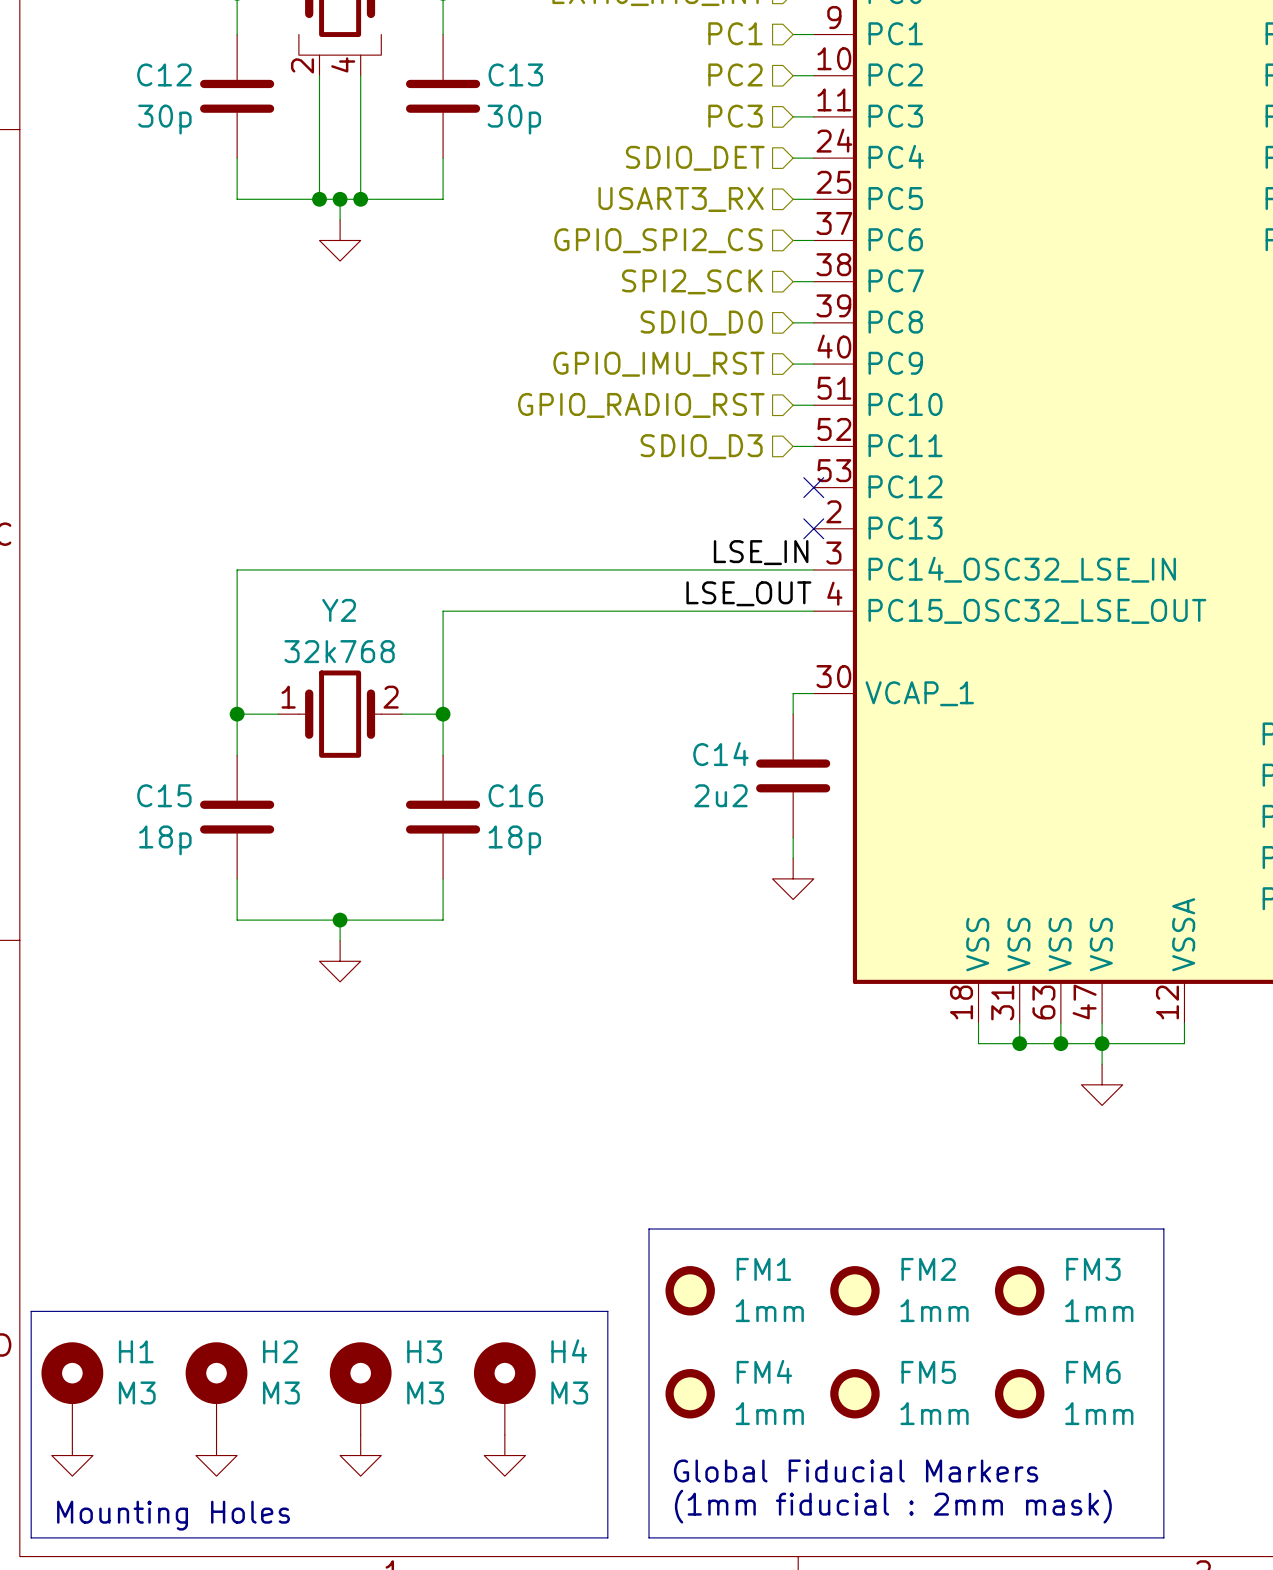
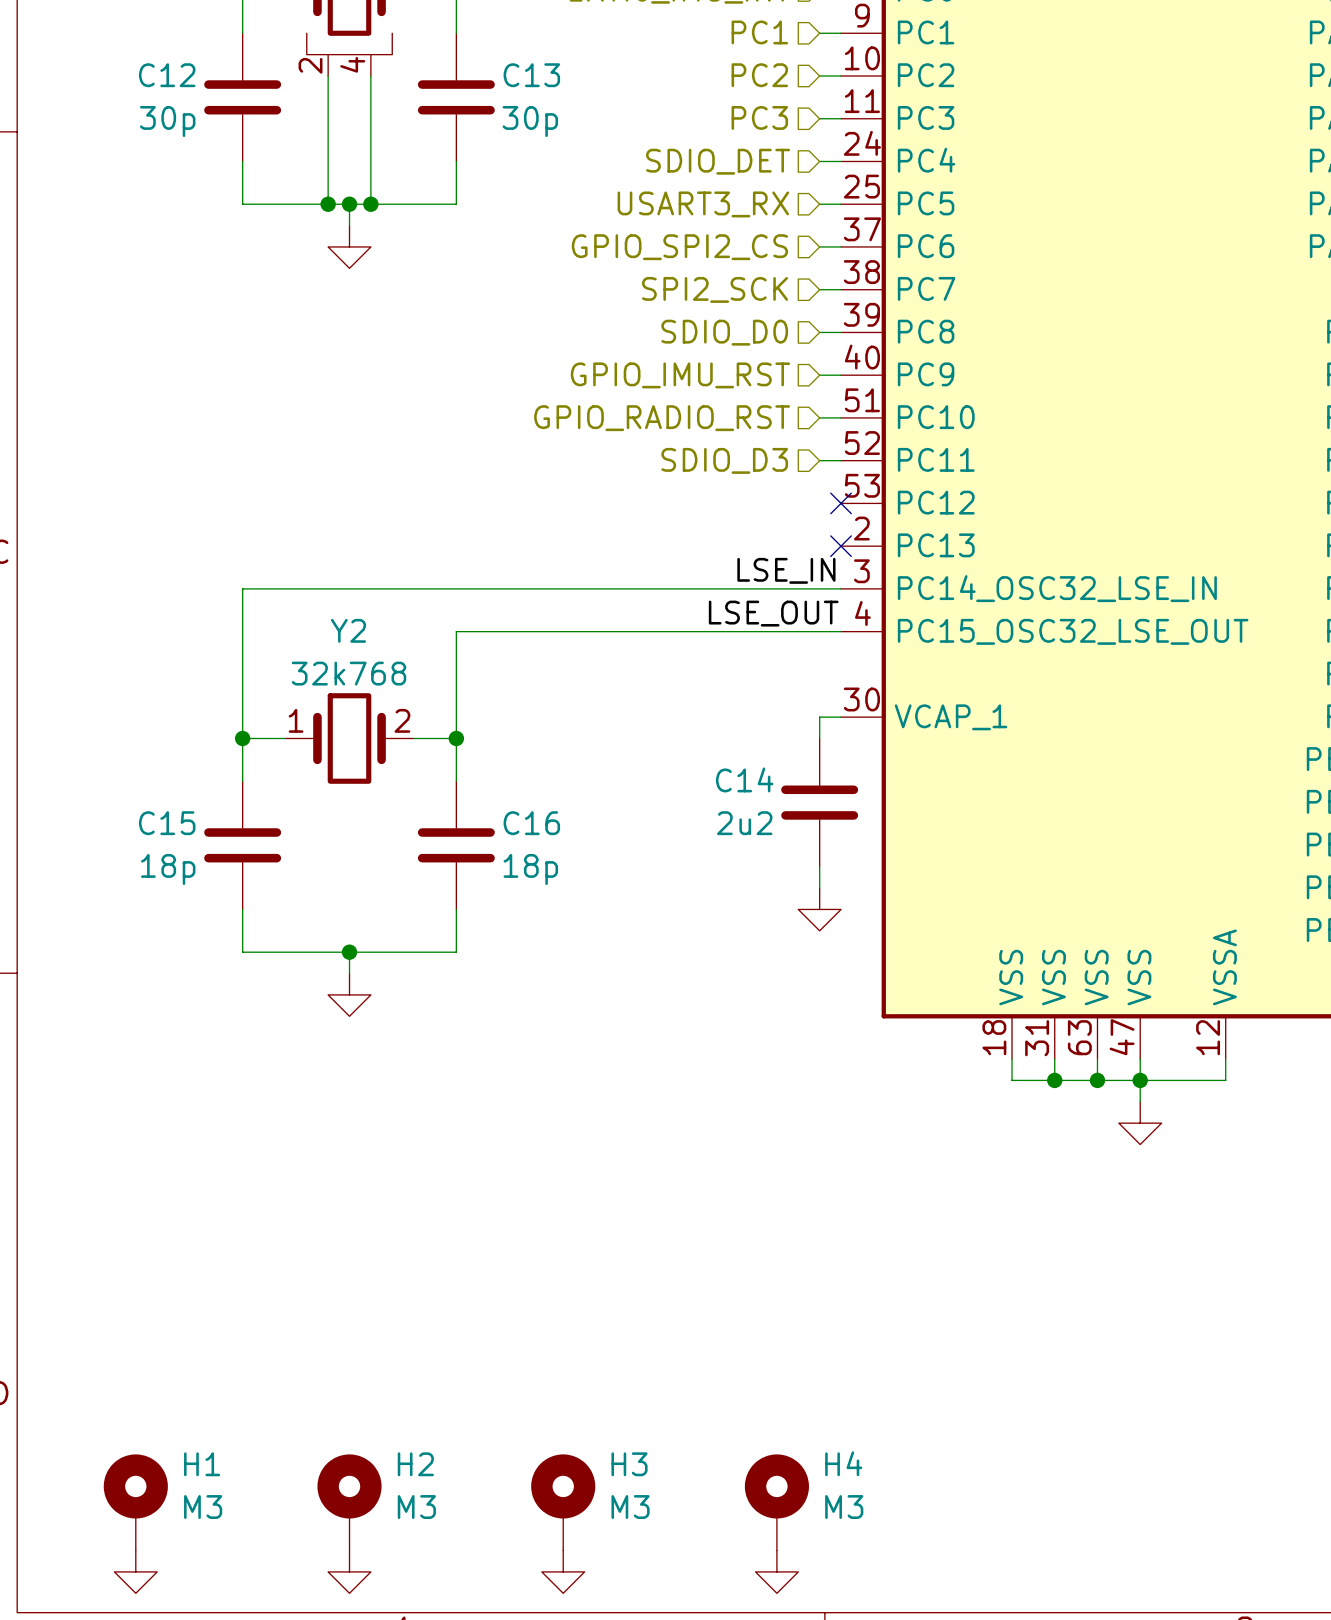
line: (649, 1229) (1163, 1229) (1163, 1537) (649, 1537) (649, 1229) -> none
FM1: 1mm (690, 1290) -> none
FM2: 1mm (854, 1290) -> none
FM3: 1mm (1019, 1290) -> none
line: (31, 1311) (607, 1311) (607, 1537) (31, 1537) (31, 1311) -> none
H1 position: (72, 1388) -> (135, 1502)
H2 position: (216, 1388) -> (349, 1502)
H3 position: (360, 1388) -> (563, 1502)
H4 position: (504, 1388) -> (776, 1502)
FM4: 1mm (690, 1393) -> none
FM5: 1mm (854, 1393) -> none
FM6: 1mm (1019, 1393) -> none
power symbol: (72, 1455) -> none
power symbol: (216, 1455) -> none
power symbol position: (360, 1455) -> (349, 1571)
power symbol position: (504, 1455) -> (563, 1571)
text: Global Fiducial Markers (856, 1471) -> none
text: (1mm fiducial : 2mm mask) (893, 1506) -> none
text: Mounting Holes (173, 1515) -> none
power symbol: none -> (135, 1571)
power symbol: none -> (776, 1571)

